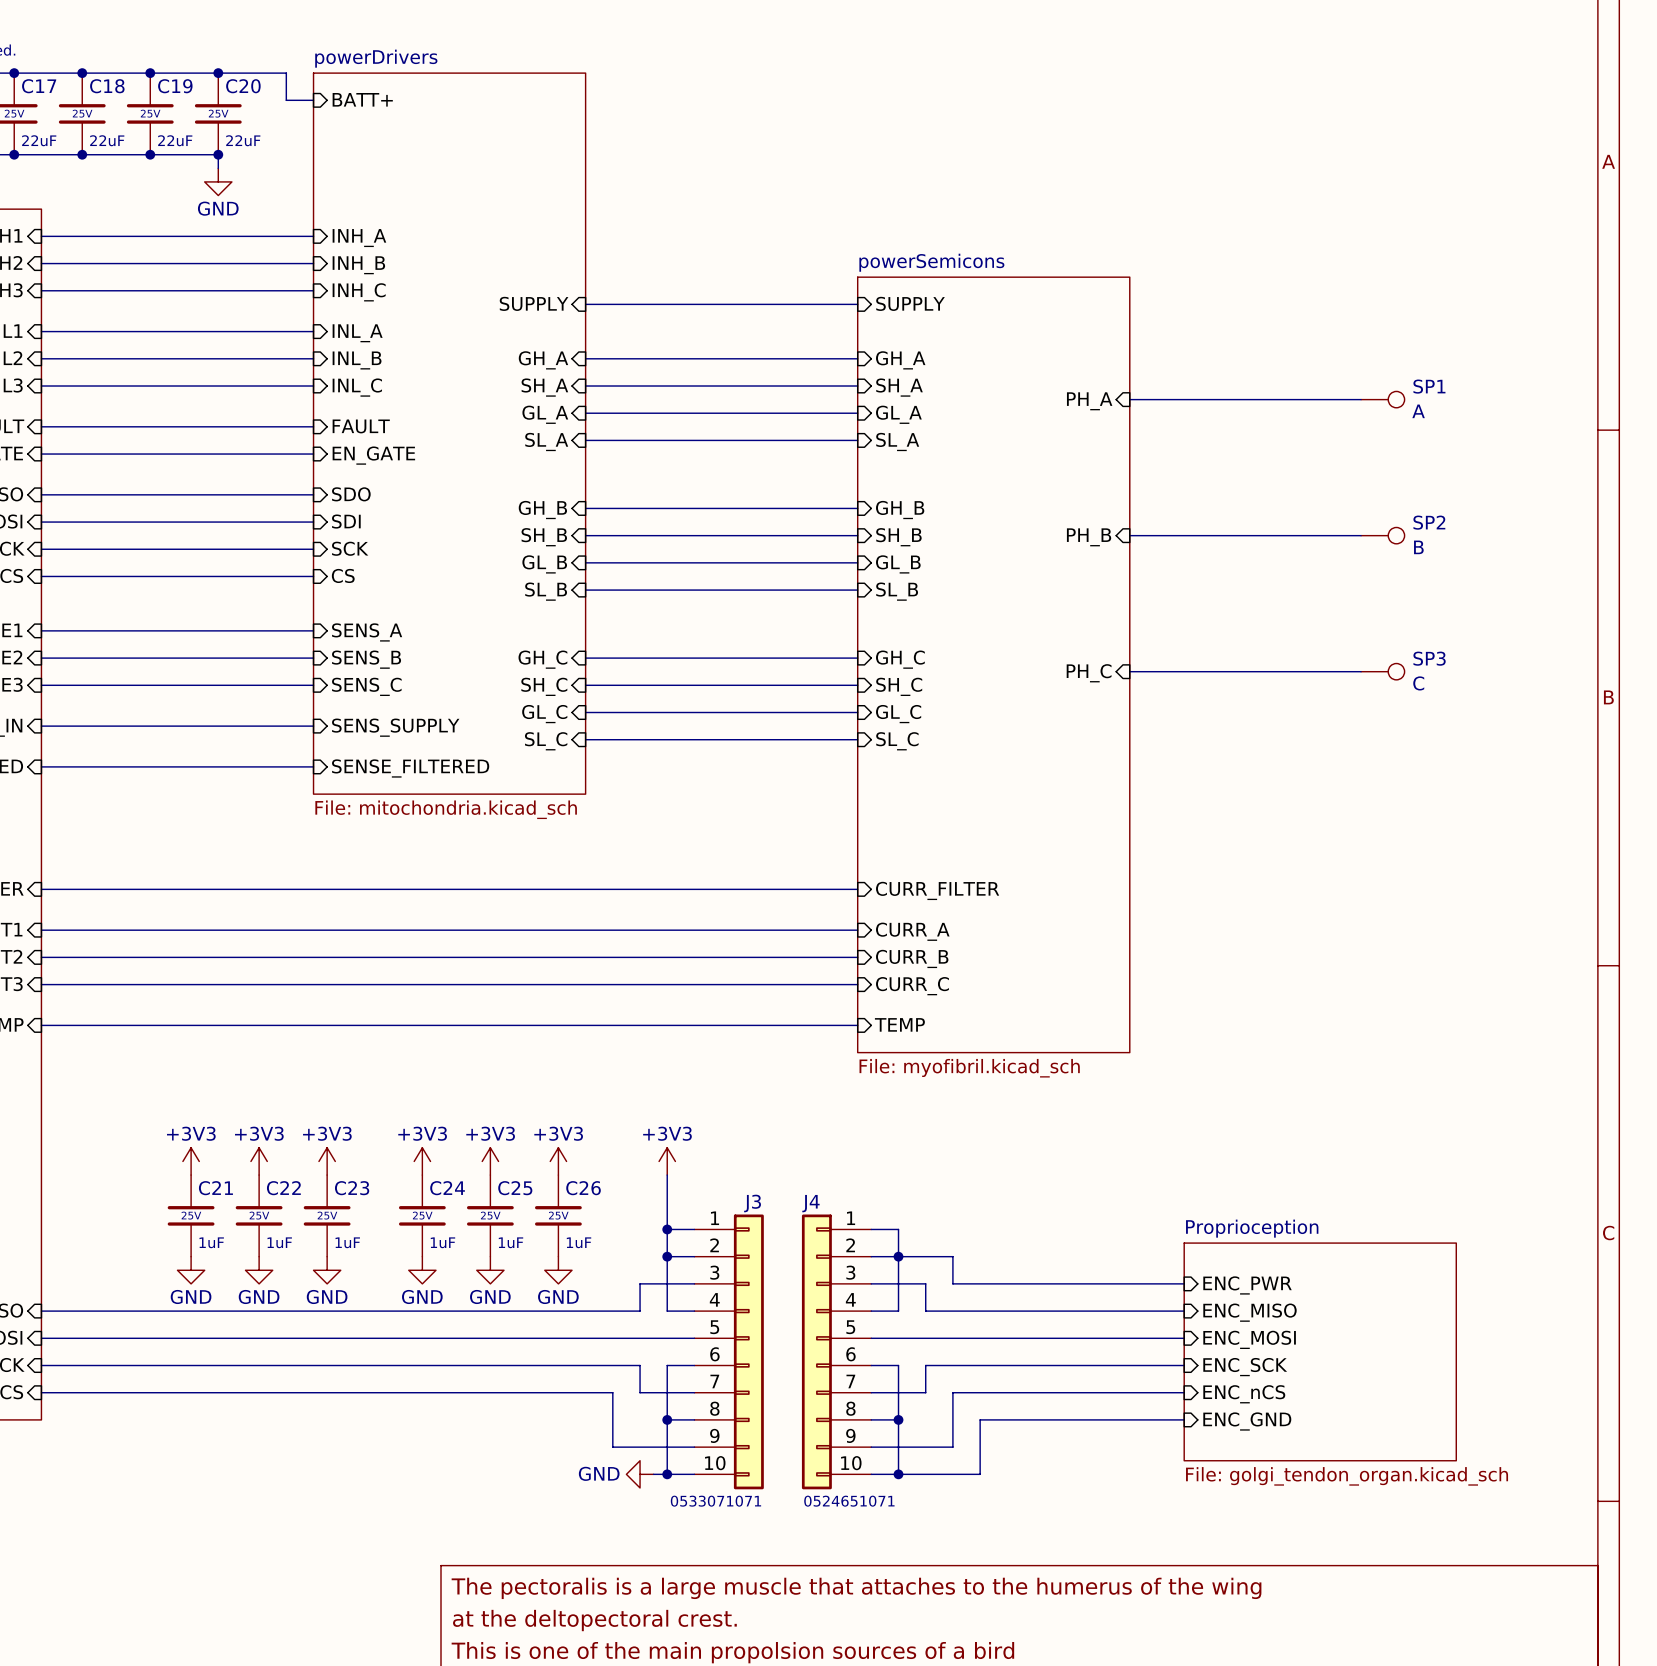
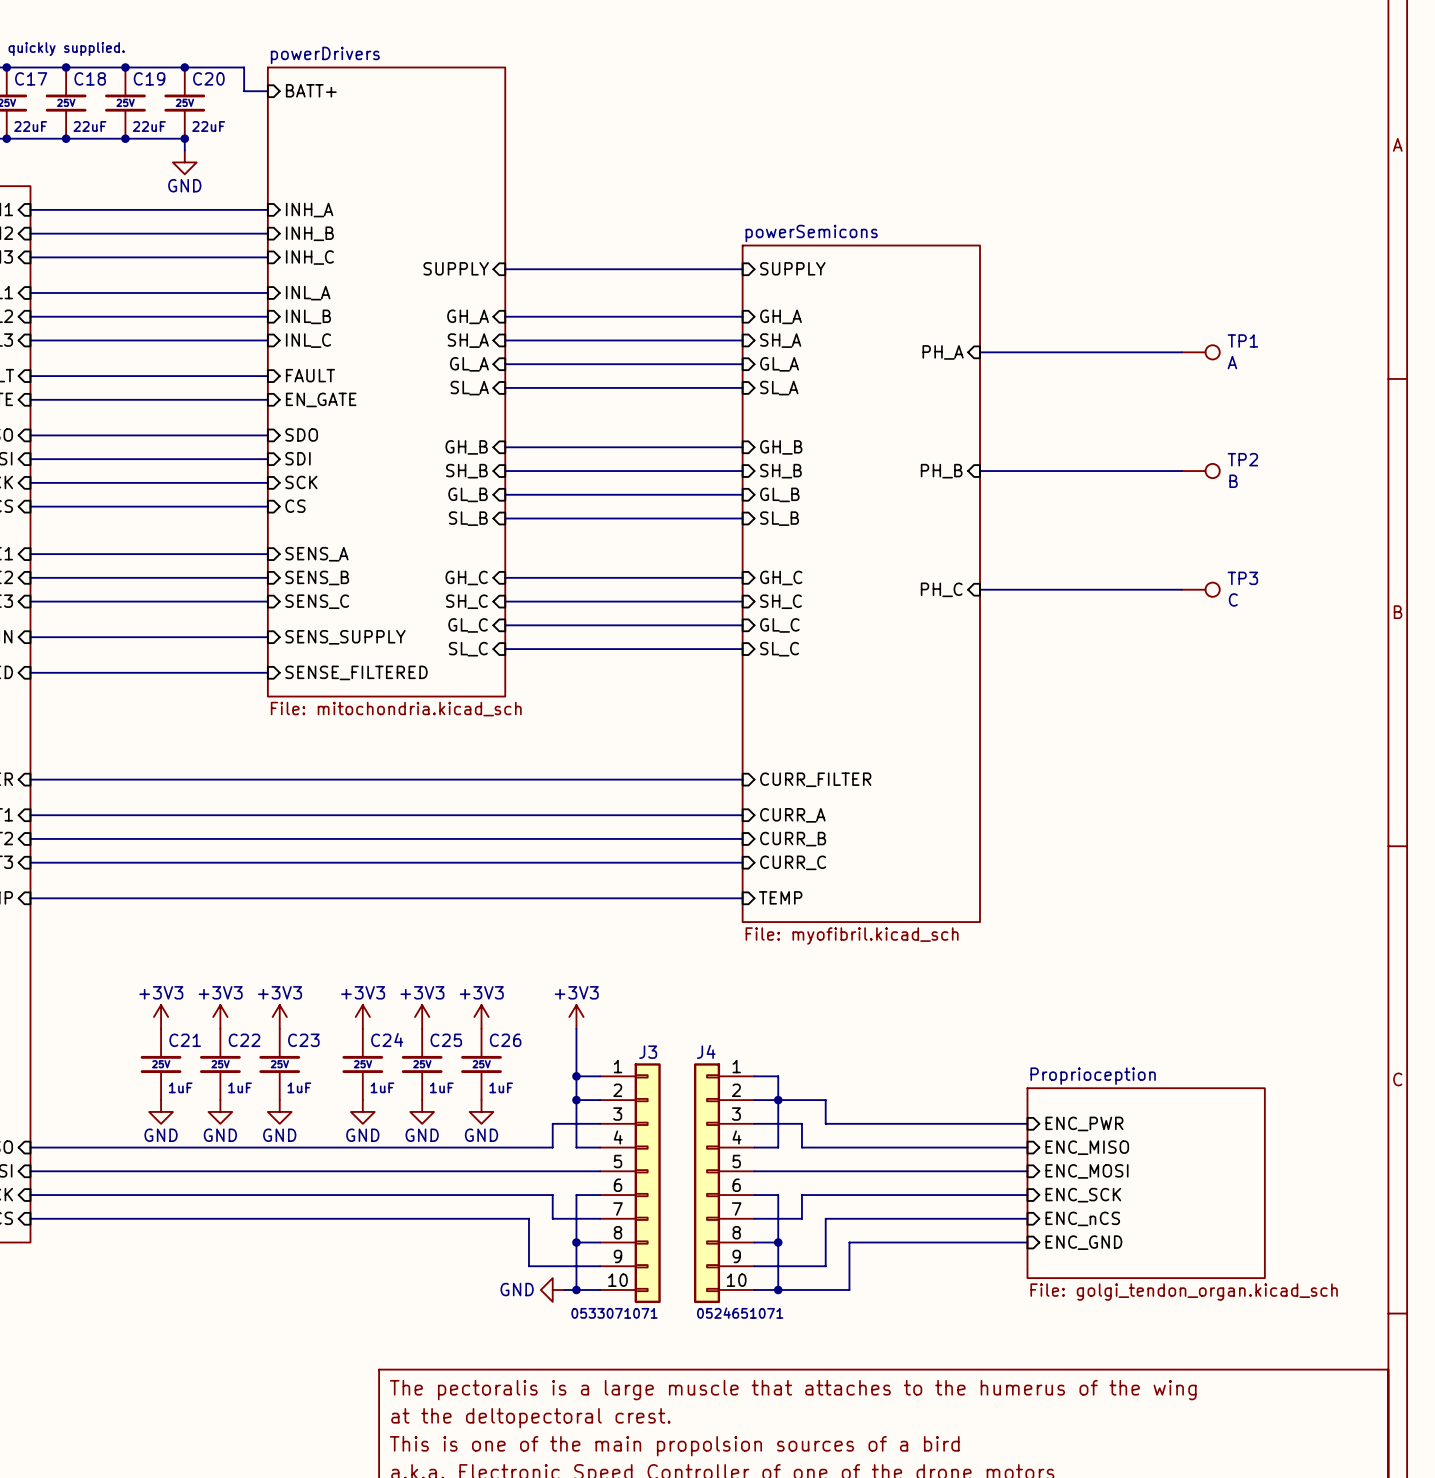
SP1 name: SP1 (1429, 386) -> TP1 (1242, 340)
SP2 name: SP2 (1429, 522) -> TP2 (1242, 459)
SP3 name: SP3 (1429, 658) -> TP3 (1242, 578)

